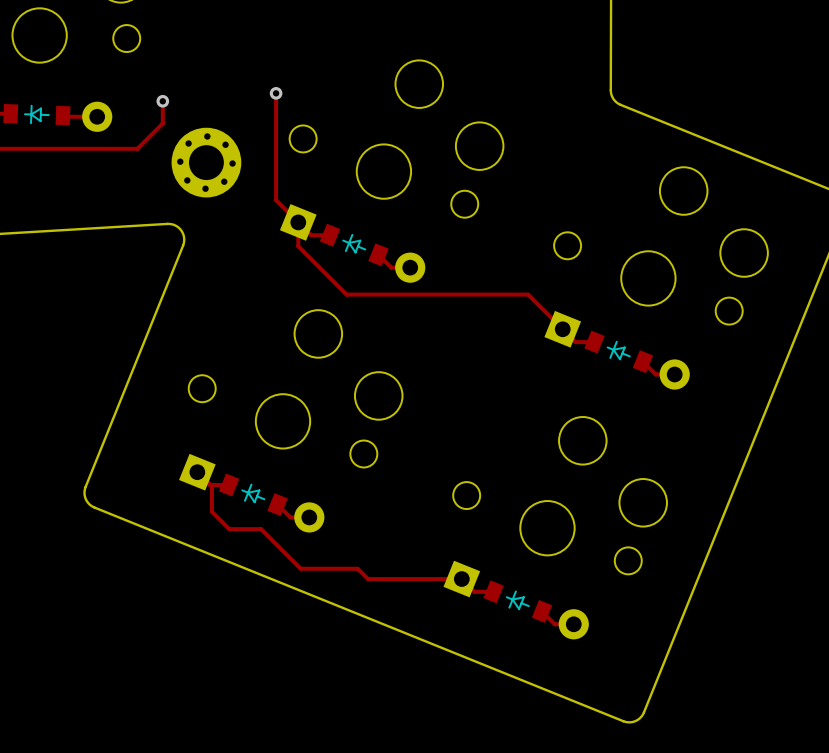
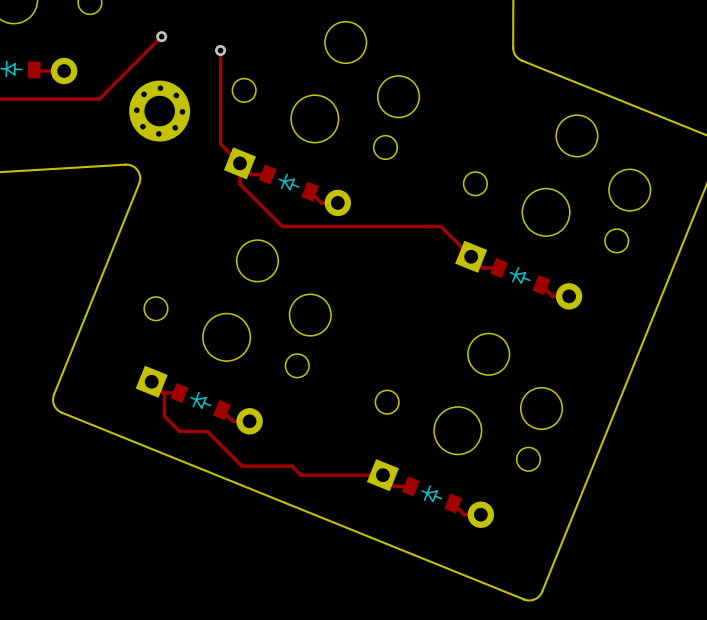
track: (162, 101) (162, 123) -> (161, 36) (121, 76)
via position: (162, 101) -> (161, 36)

